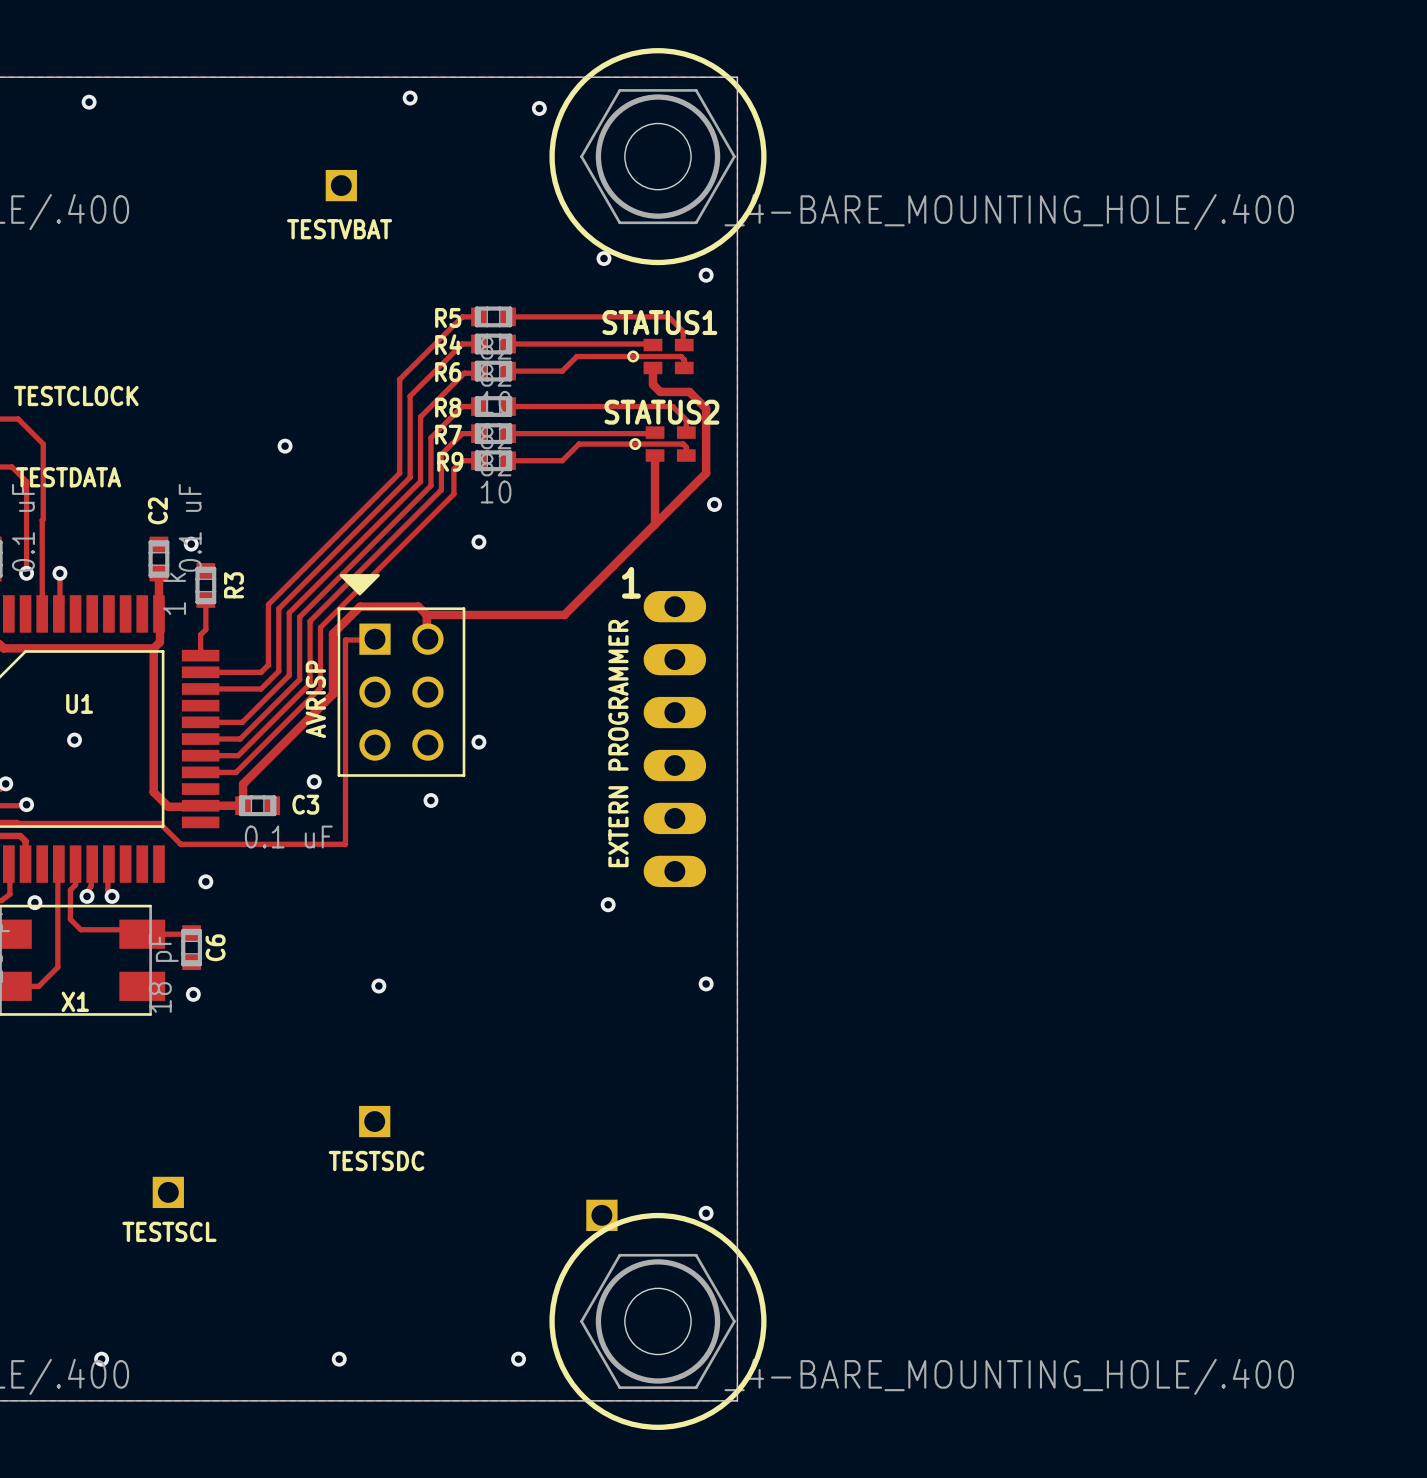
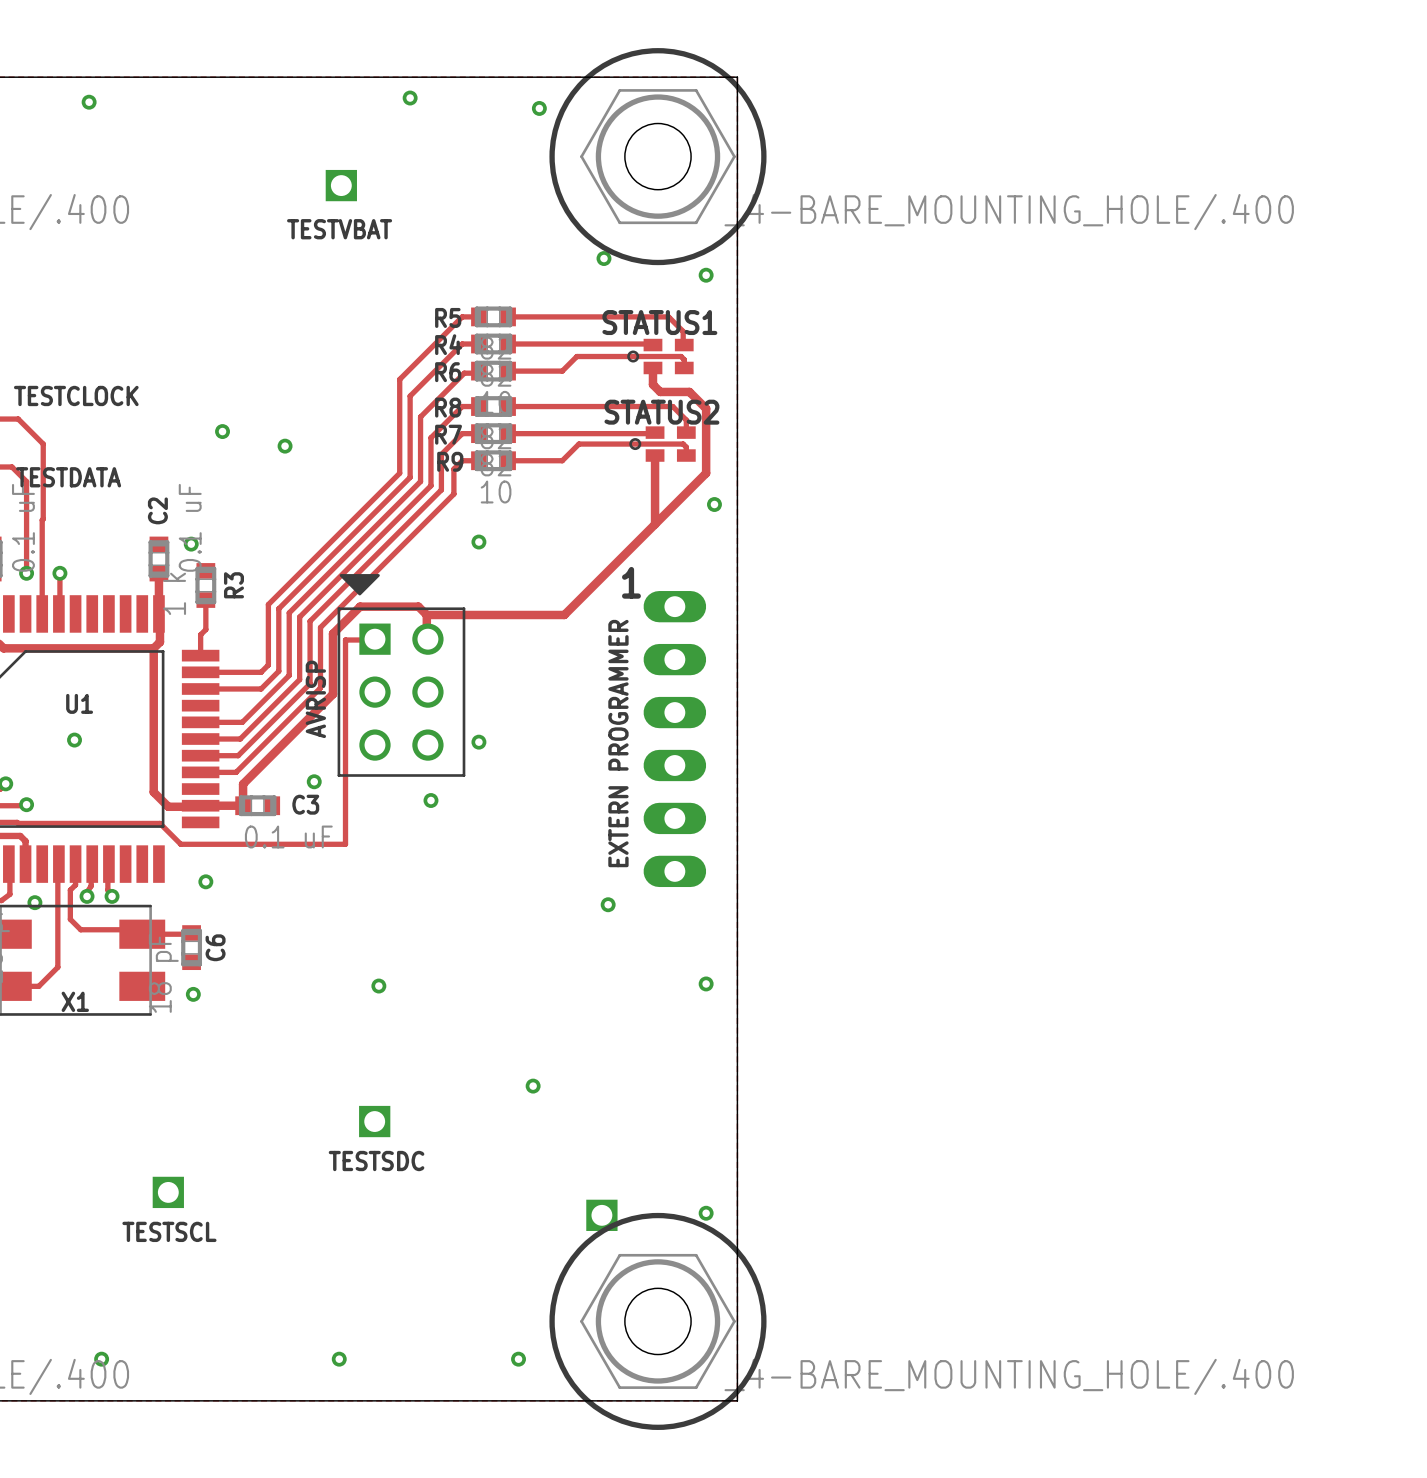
via: none -> (222, 431)
via: none -> (533, 1086)

